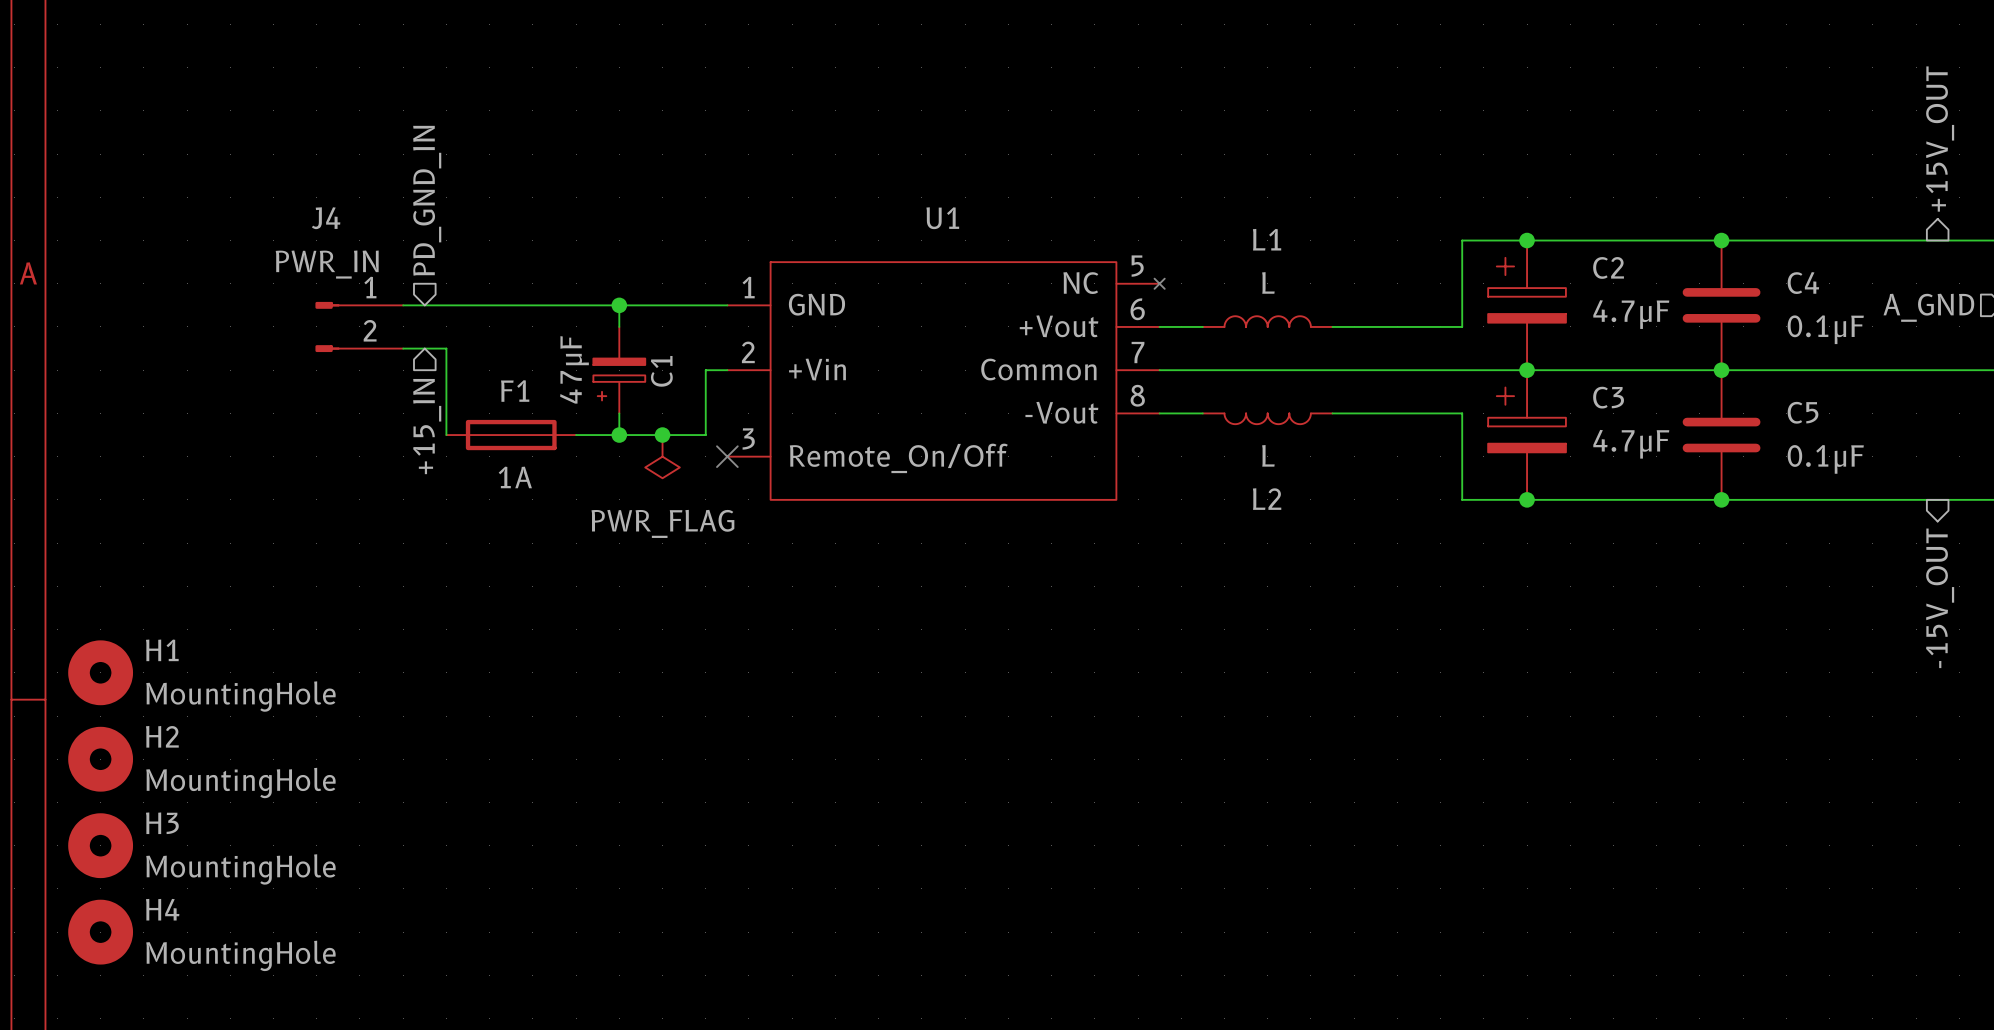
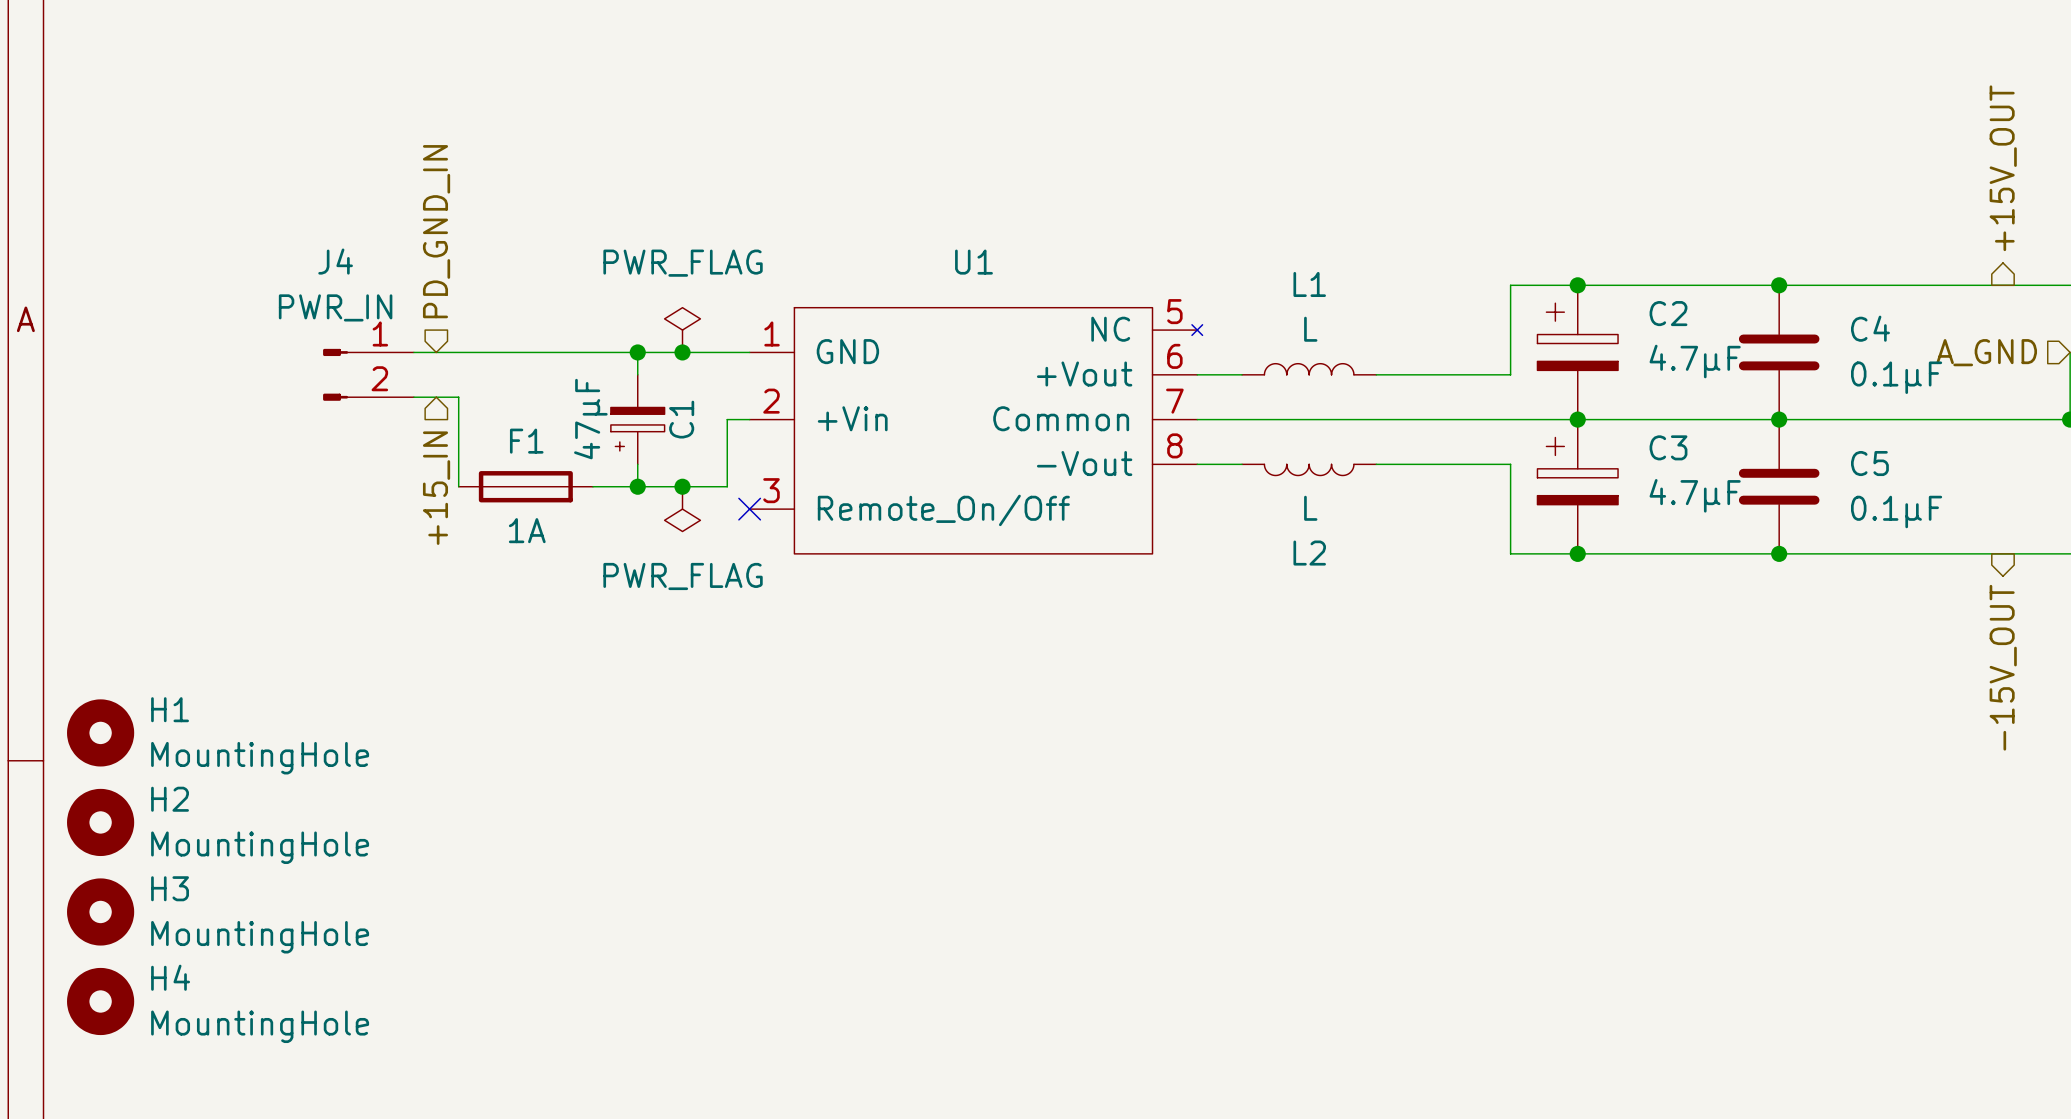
power symbol: none -> PWR_FLAG (682, 330)
junction: none -> (682, 352)

